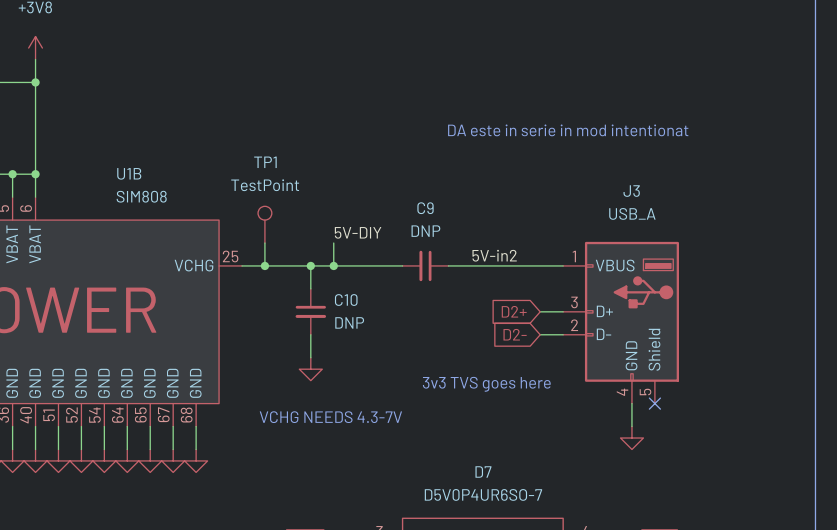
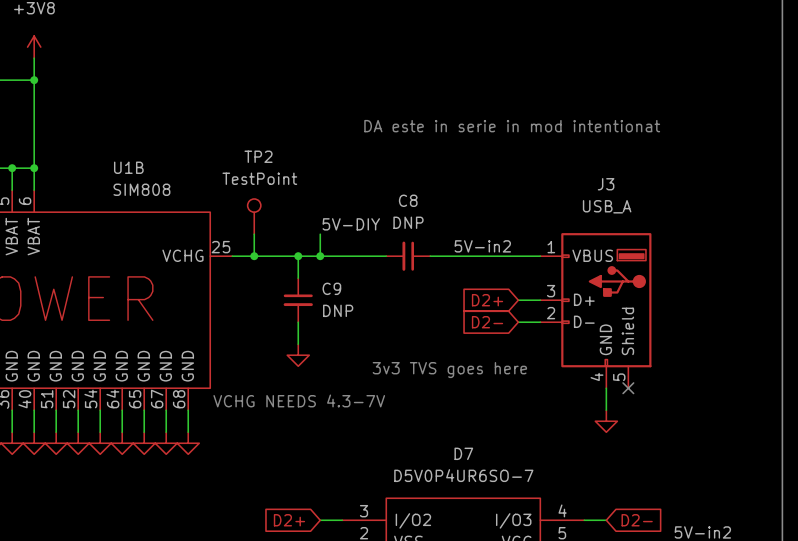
TP1 name: TP1 (265, 162) -> TP2 (258, 156)
C9 name: C9 (425, 208) -> C8 (408, 200)
C10 name: C10 (346, 300) -> C9 (331, 288)

